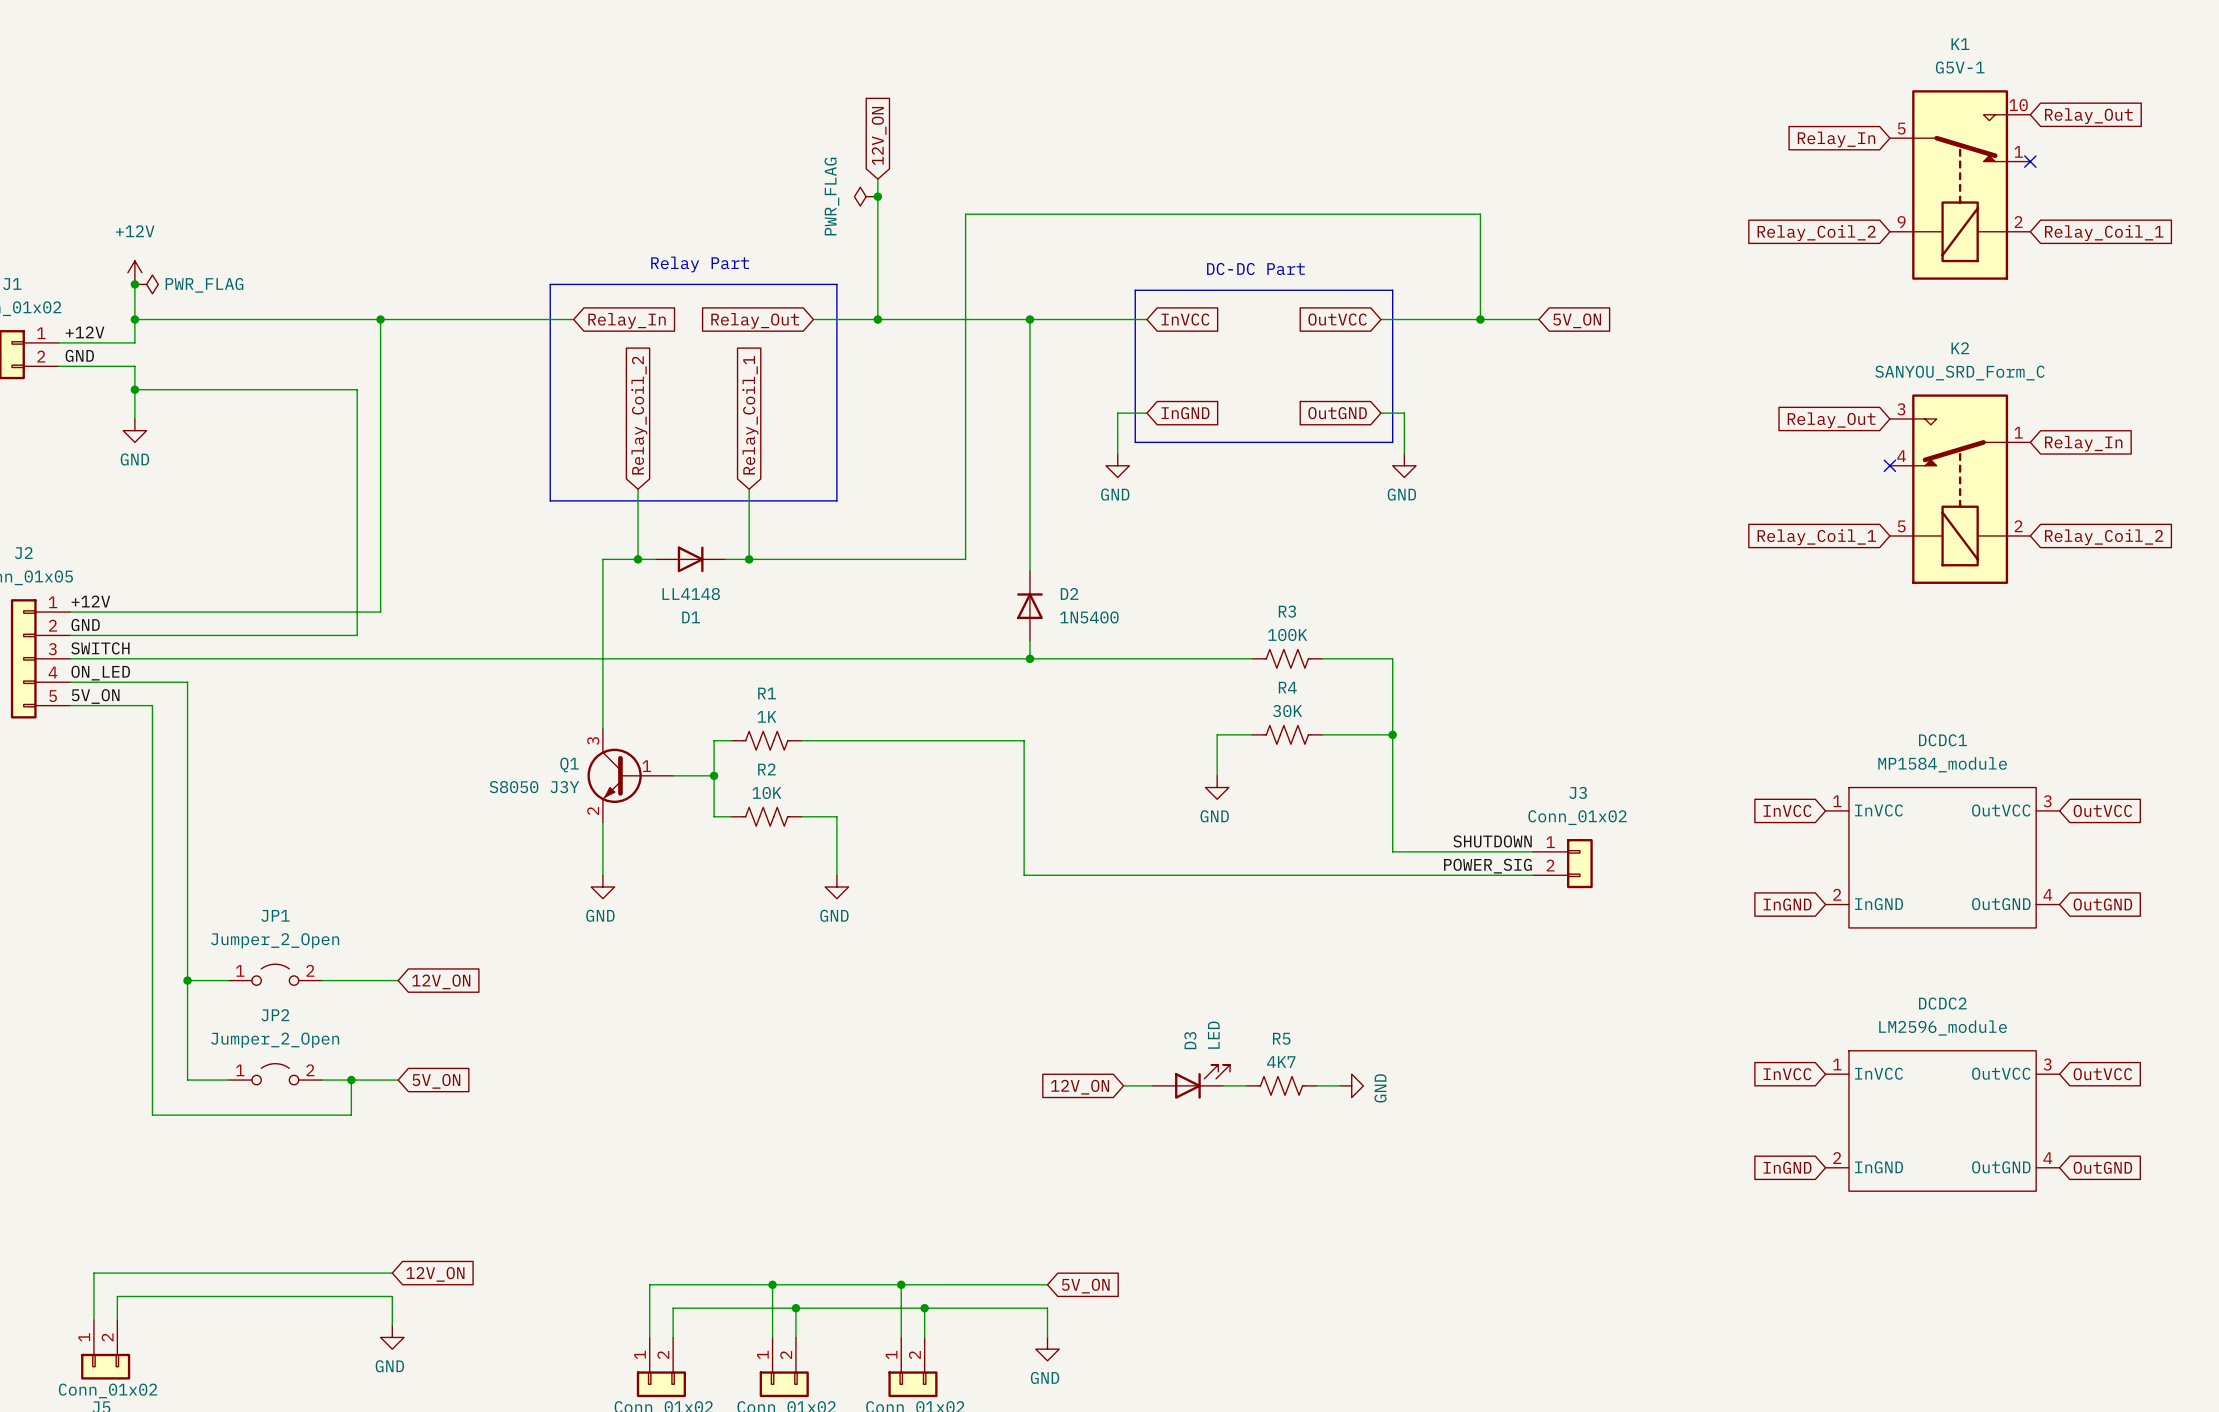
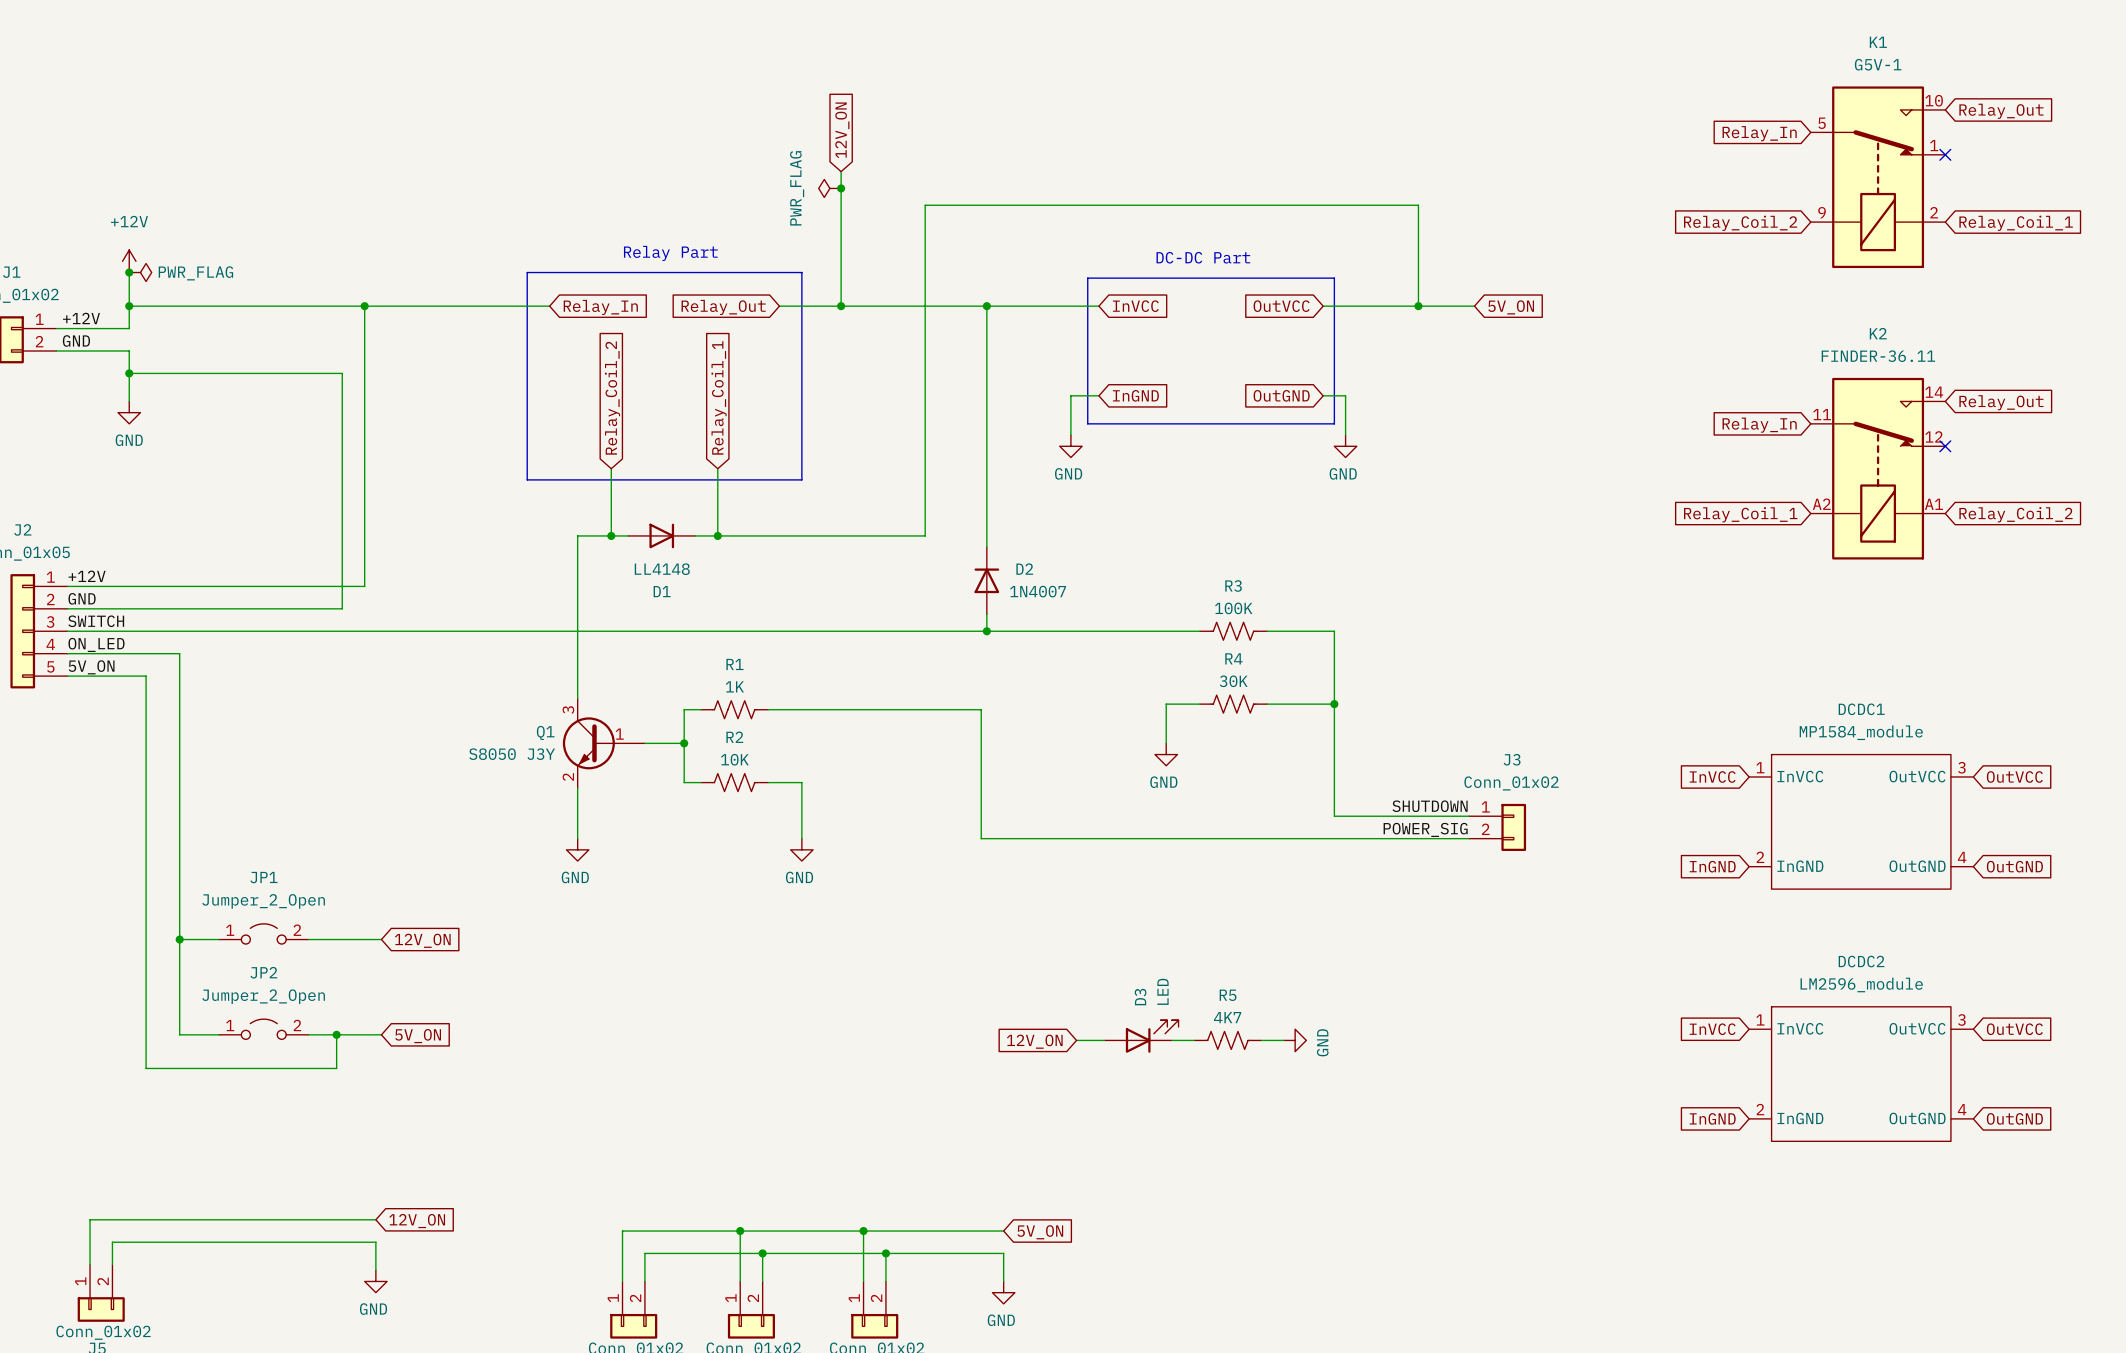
K2 value: SANYOU_SRD_Form_C (1959, 373) -> FINDER-36.11 (1878, 356)
K2 symbol: [1889, 394, 2031, 584] -> [1810, 377, 1946, 560]
global label rotation: 0° (1831, 420) -> 180° (2001, 402)
global label position: Relay_Out (1831, 420) -> Relay_Out (2001, 402)
global label rotation: 0° (2083, 443) -> 180° (1759, 425)
global label position: Relay_In (2083, 443) -> Relay_In (1759, 425)
no-connect mark: (1889, 465) -> none
no-connect mark: none -> (1945, 446)
D2 value: 1N5400 (1089, 617) -> 1N4007 (1038, 591)

